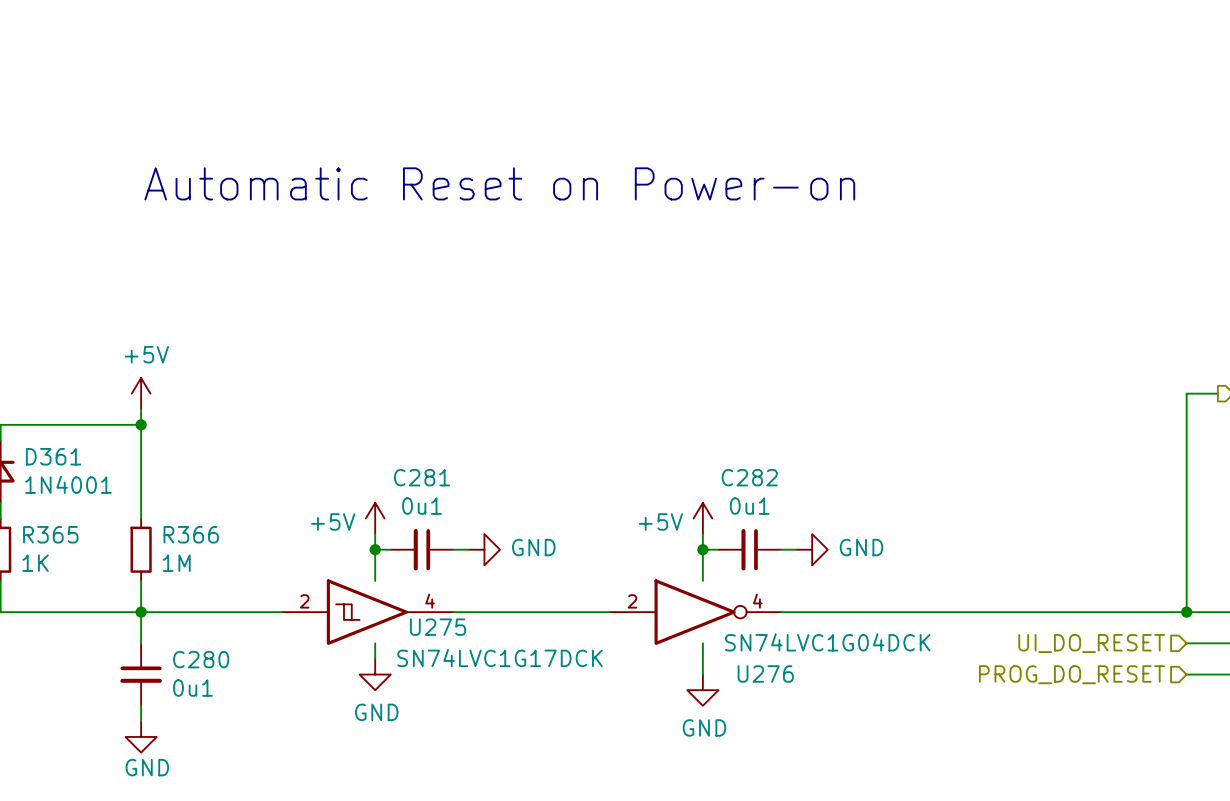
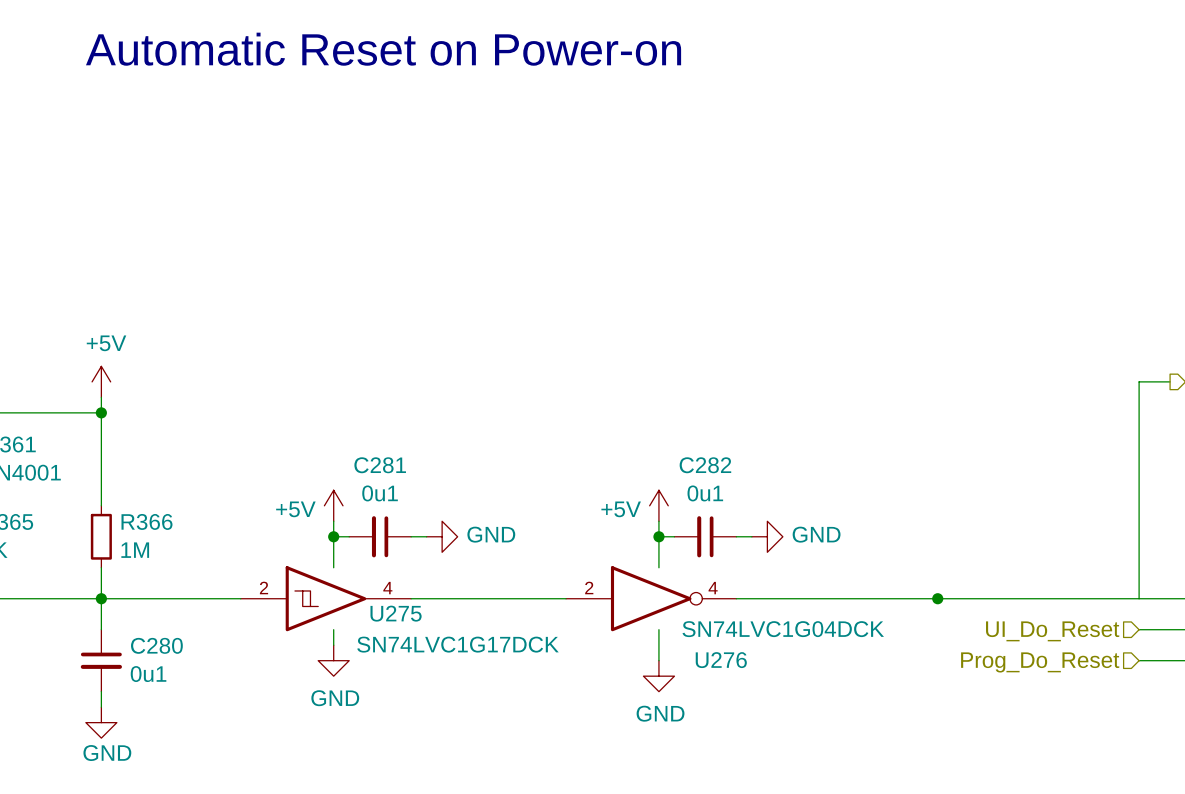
text position: Automatic Reset on Power-on (499, 183) -> Automatic Reset on Power-on (383, 49)
junction: none -> (937, 598)
junction: (1186, 612) -> none
hierarchical label: UI_DO_RESET (1091, 643) -> UI_Do_Reset (1052, 631)
hierarchical label: PROG_DO_RESET (1071, 674) -> Prog_Do_Reset (1040, 662)

